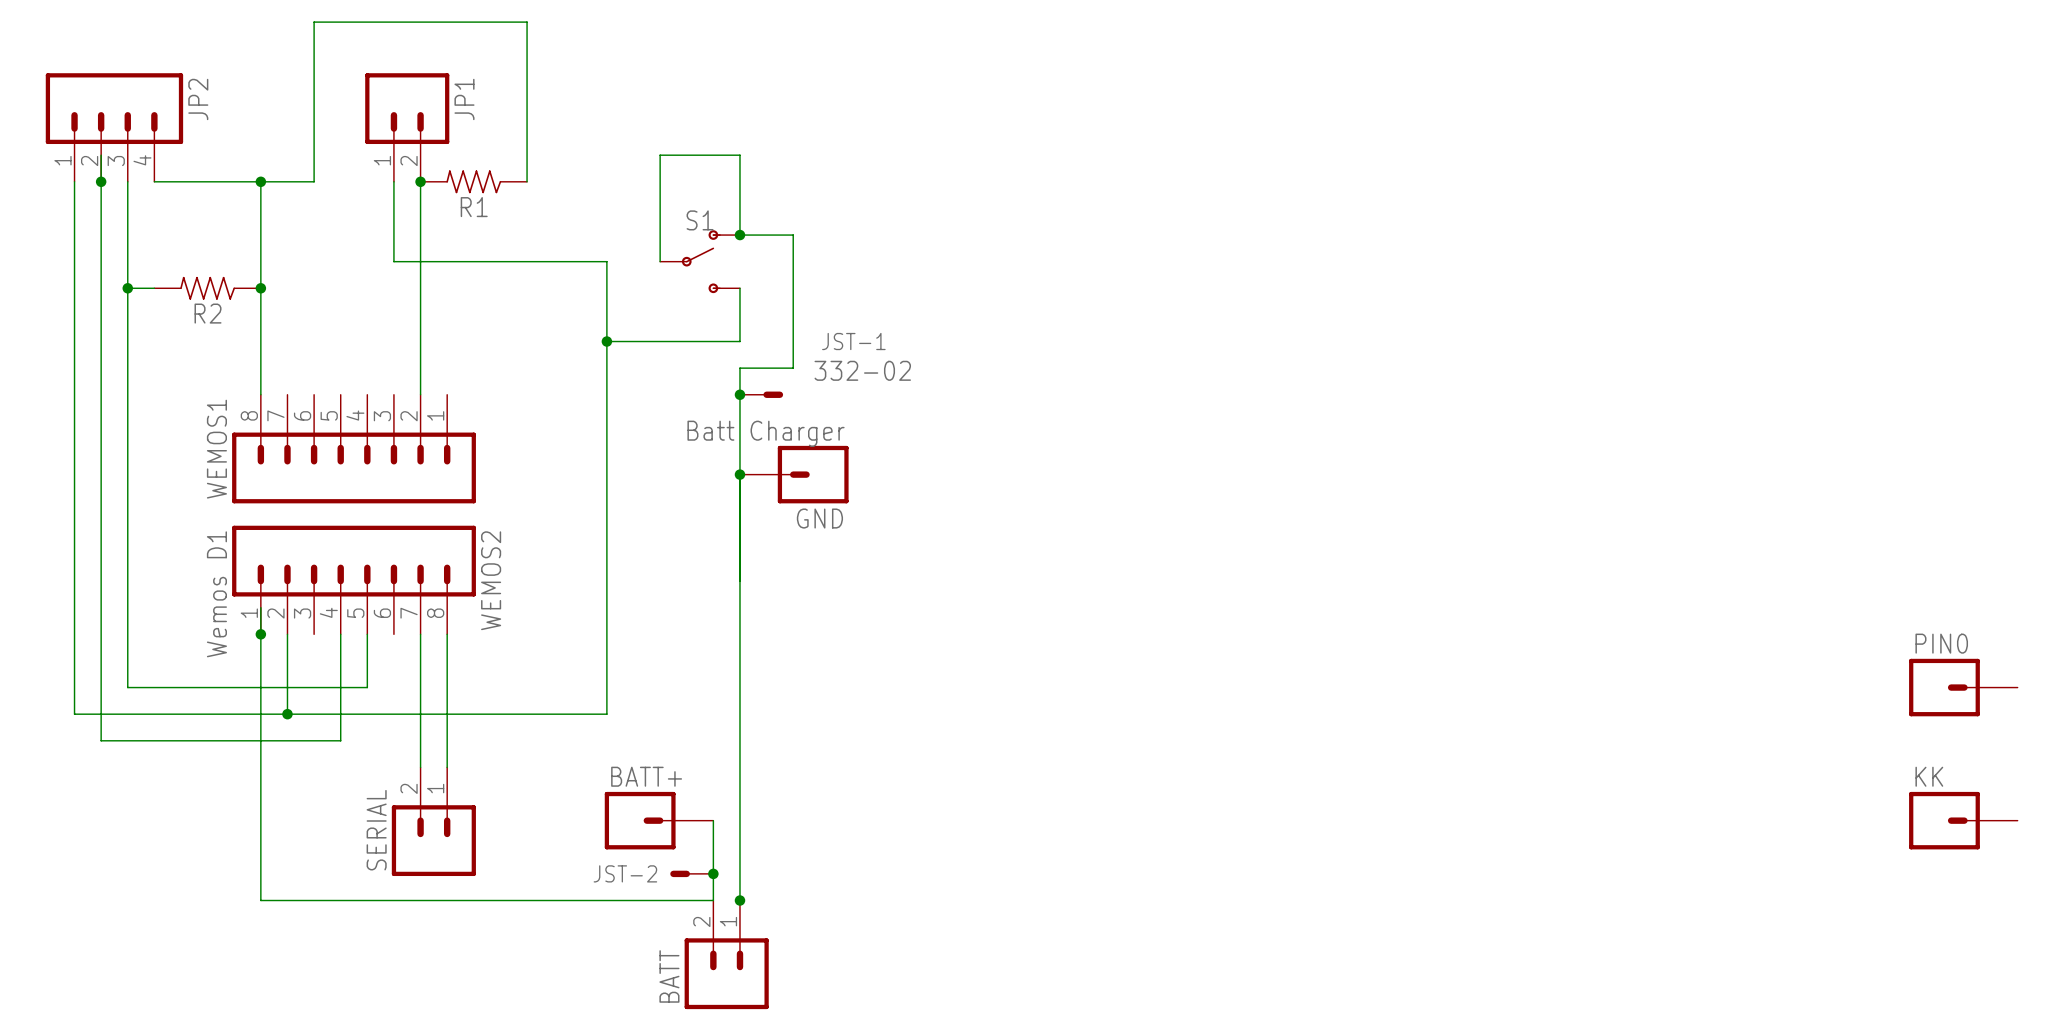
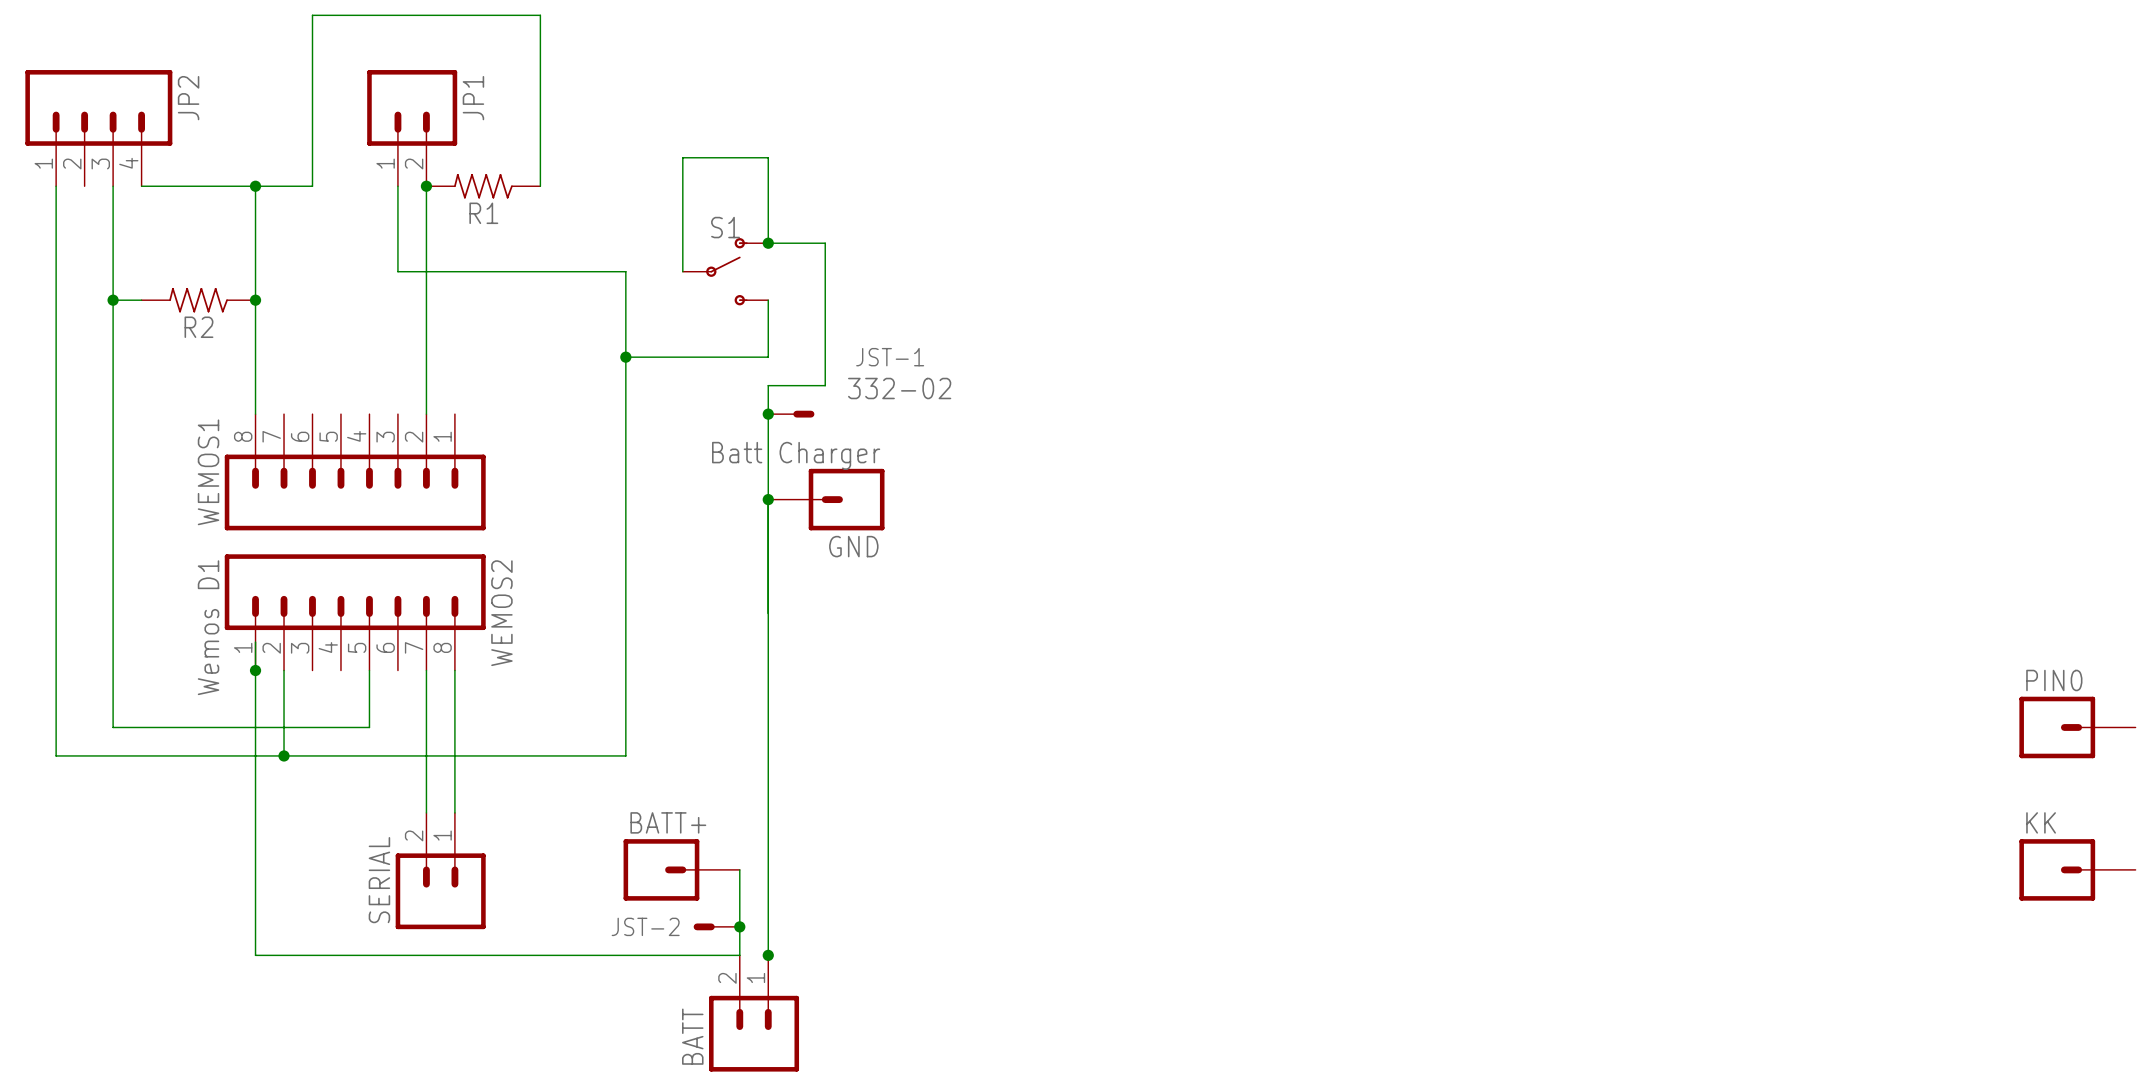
wire: (101, 155) (101, 740) (340, 740) (340, 634) -> none
junction: (101, 181) -> none

